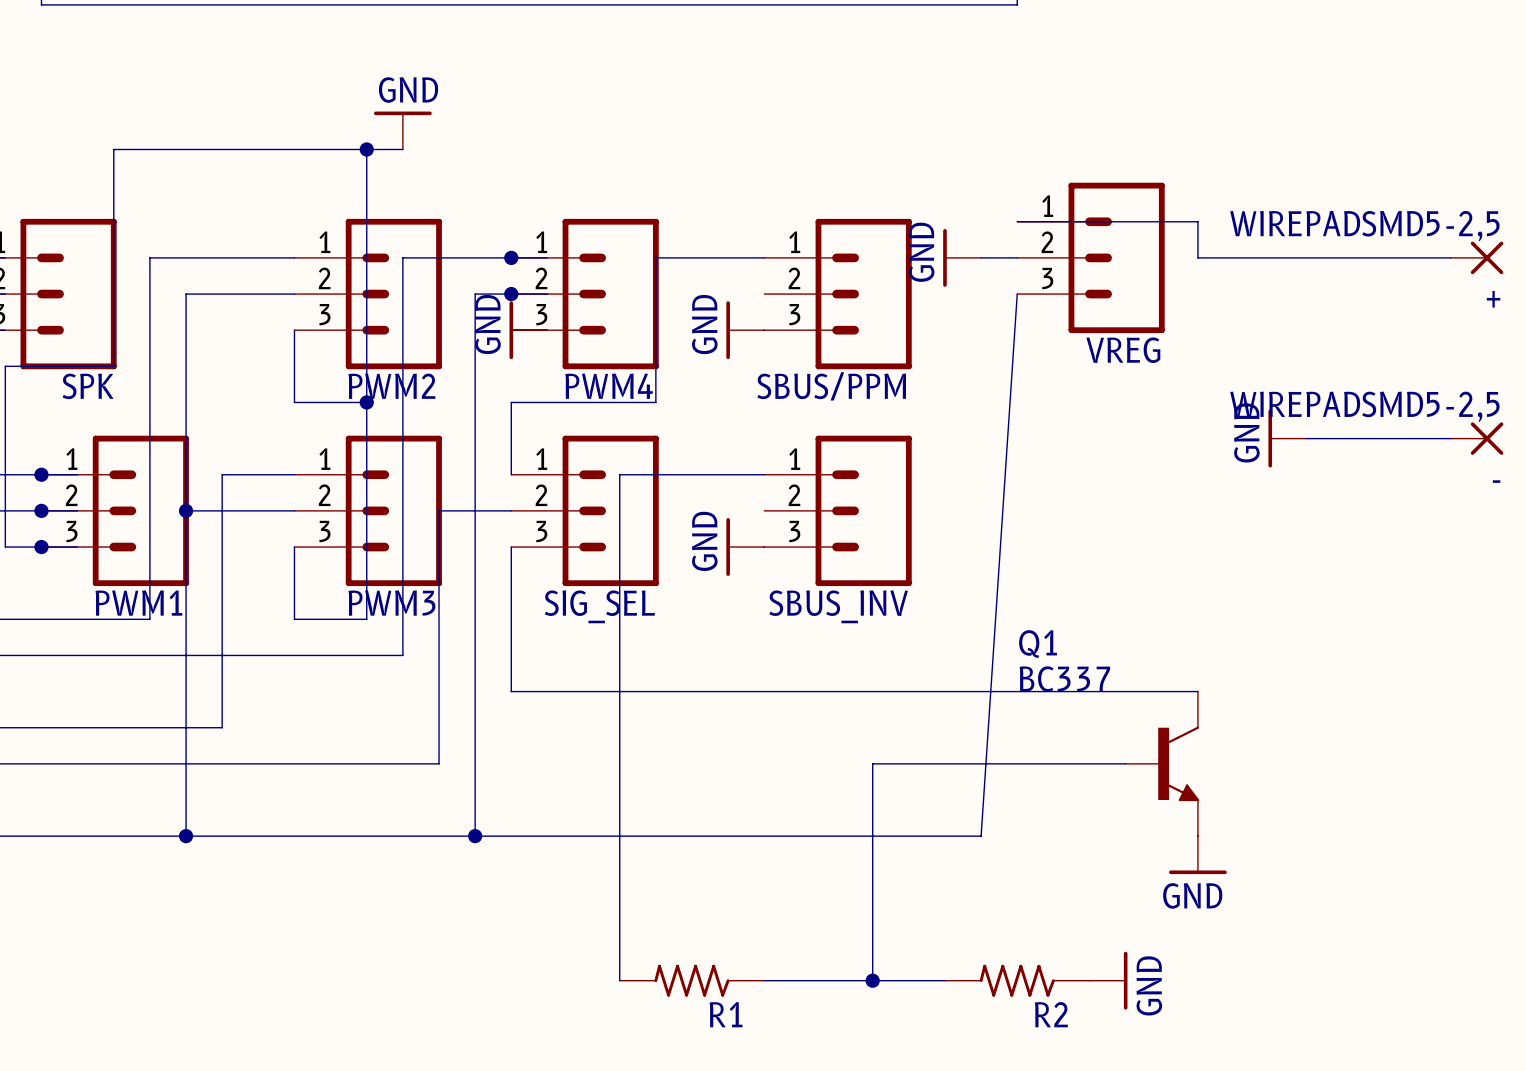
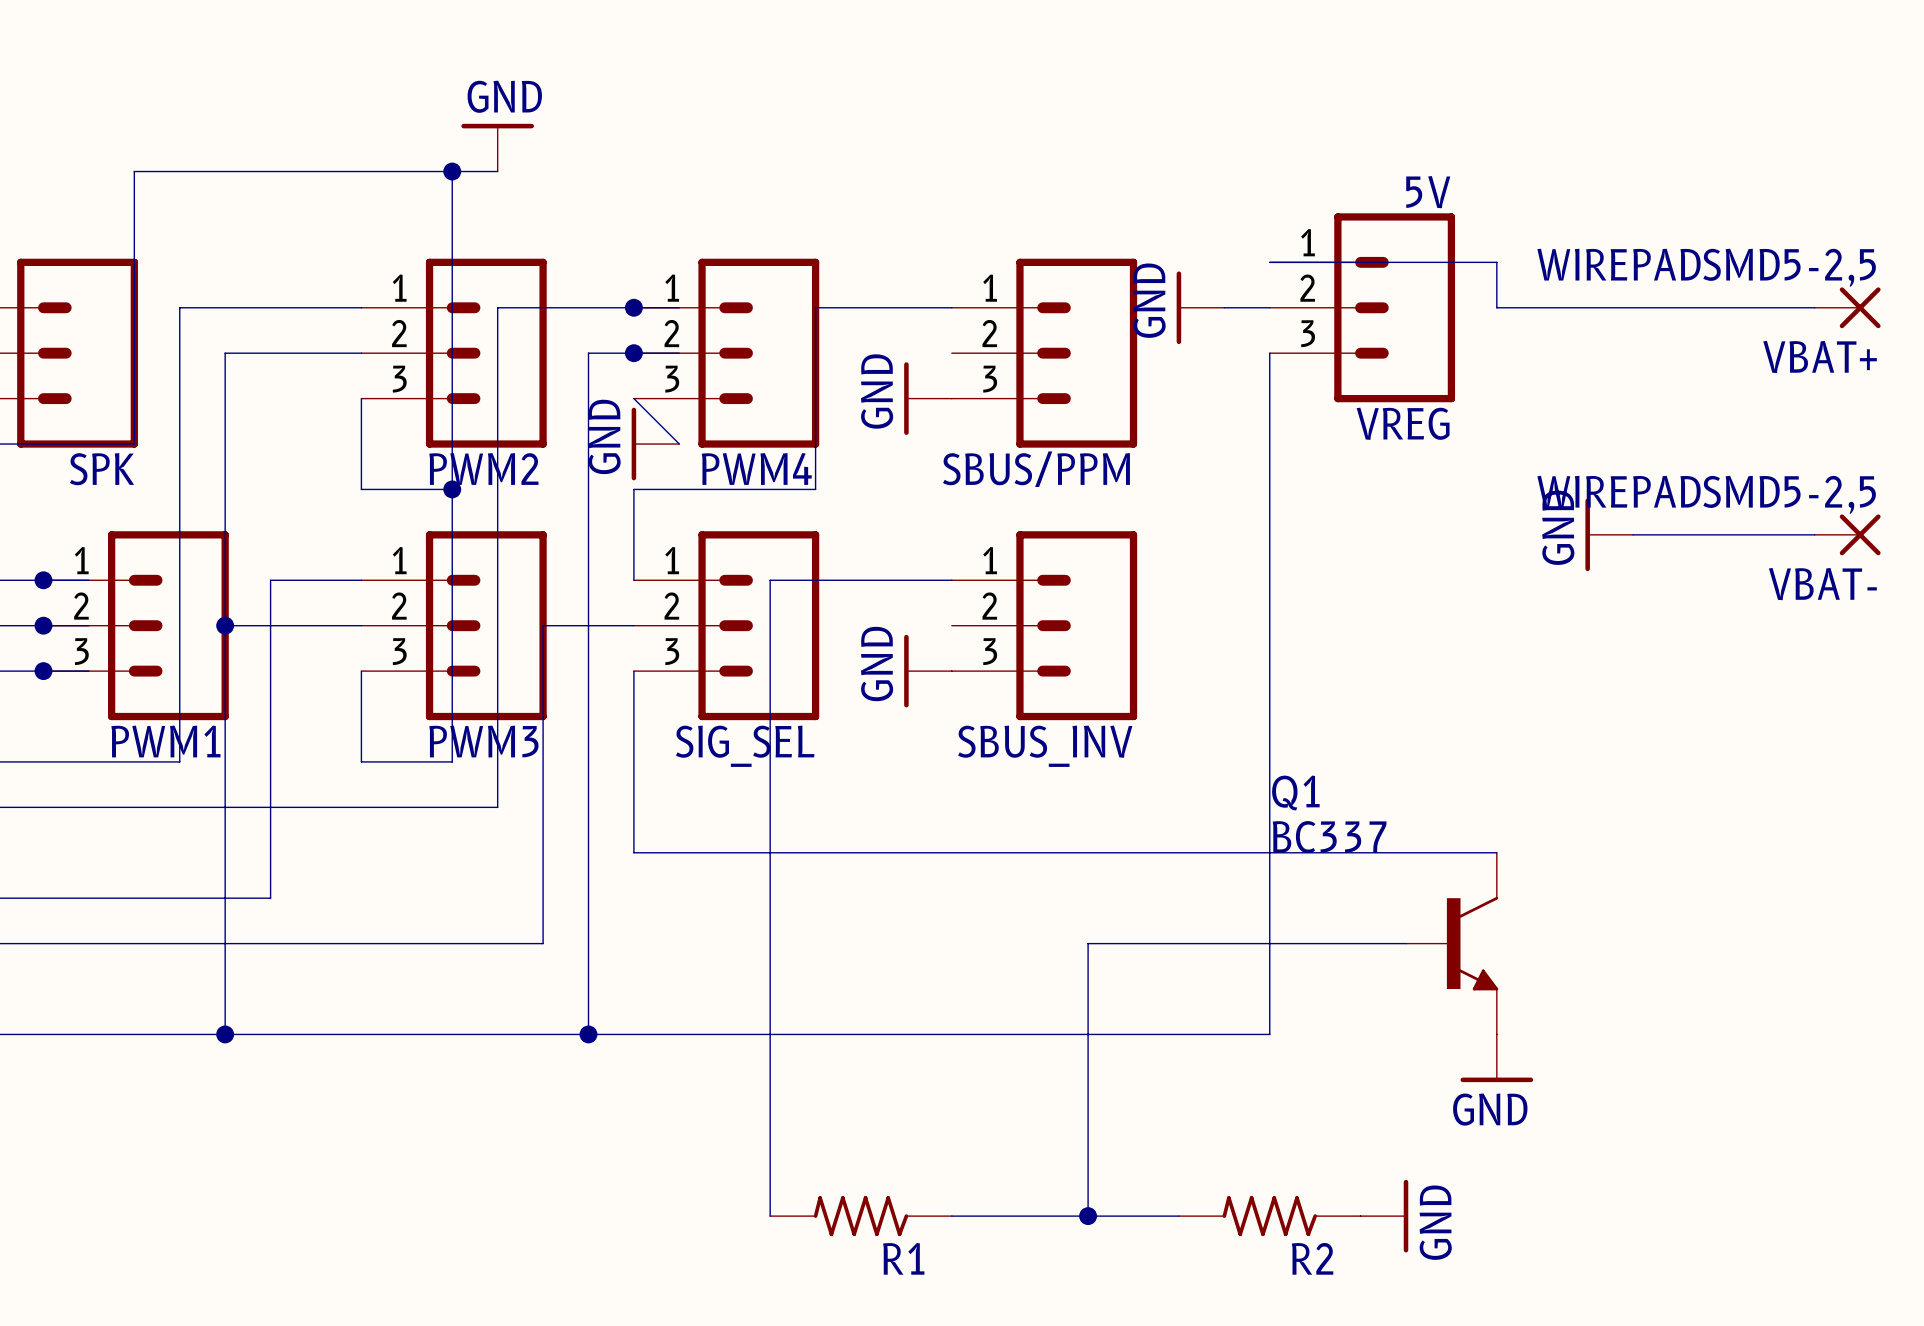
VREG value: none -> 5V (1428, 192)
wire: (1017, 294) (981, 836) -> (1269, 353) (1269, 1034) (1224, 1034)
VBAT+ name: + (1493, 299) -> VBAT+ (1820, 357)
wire: none -> (633, 398) (679, 444)
power symbol position: GND (528, 330) -> GND (655, 444)
VBAT- name: - (1496, 481) -> VBAT- (1822, 584)

